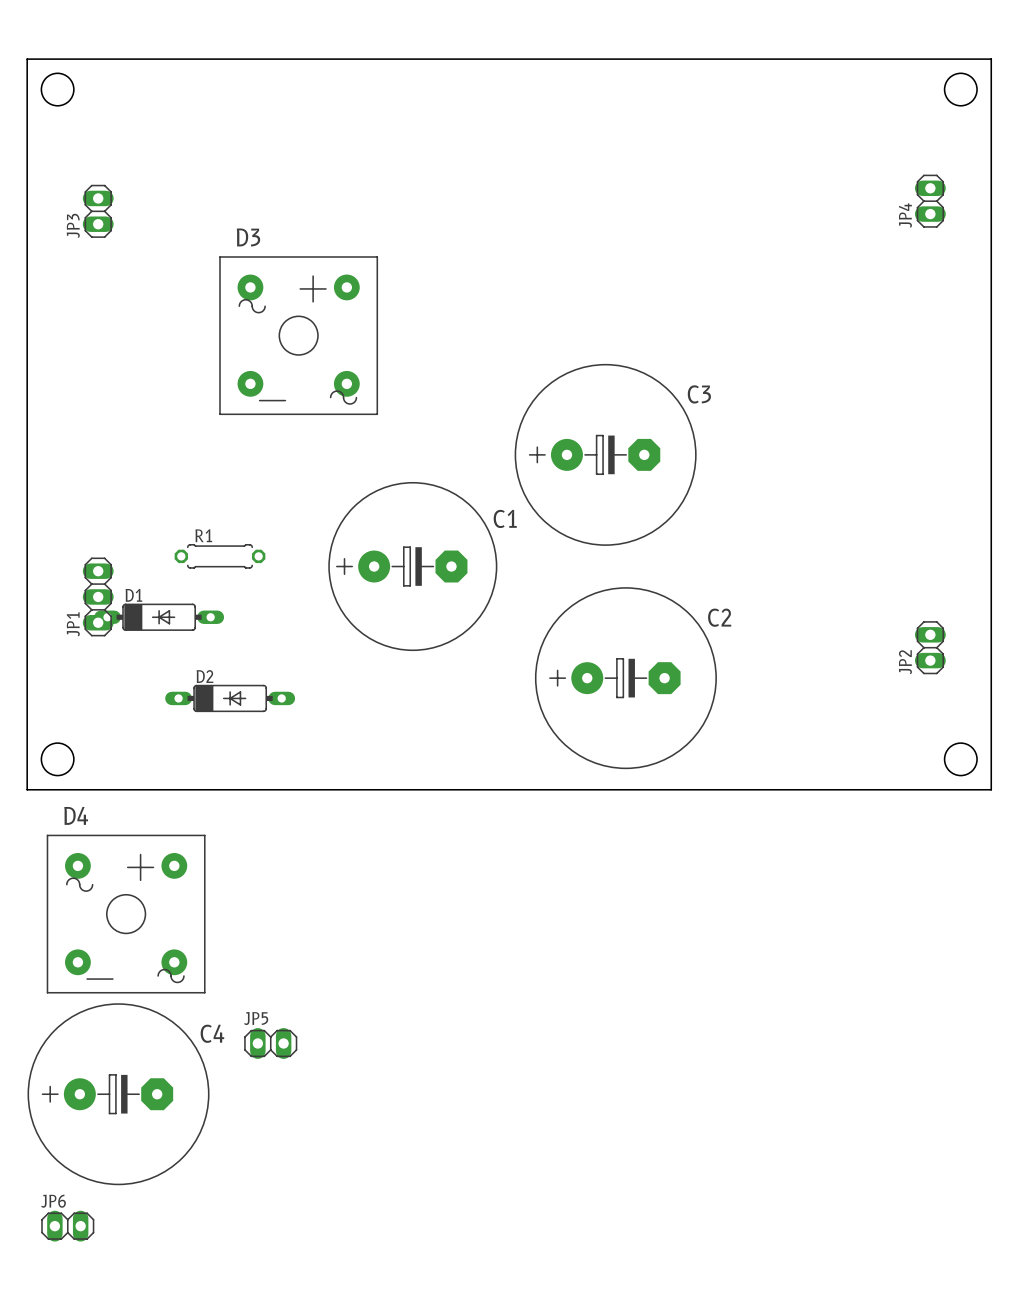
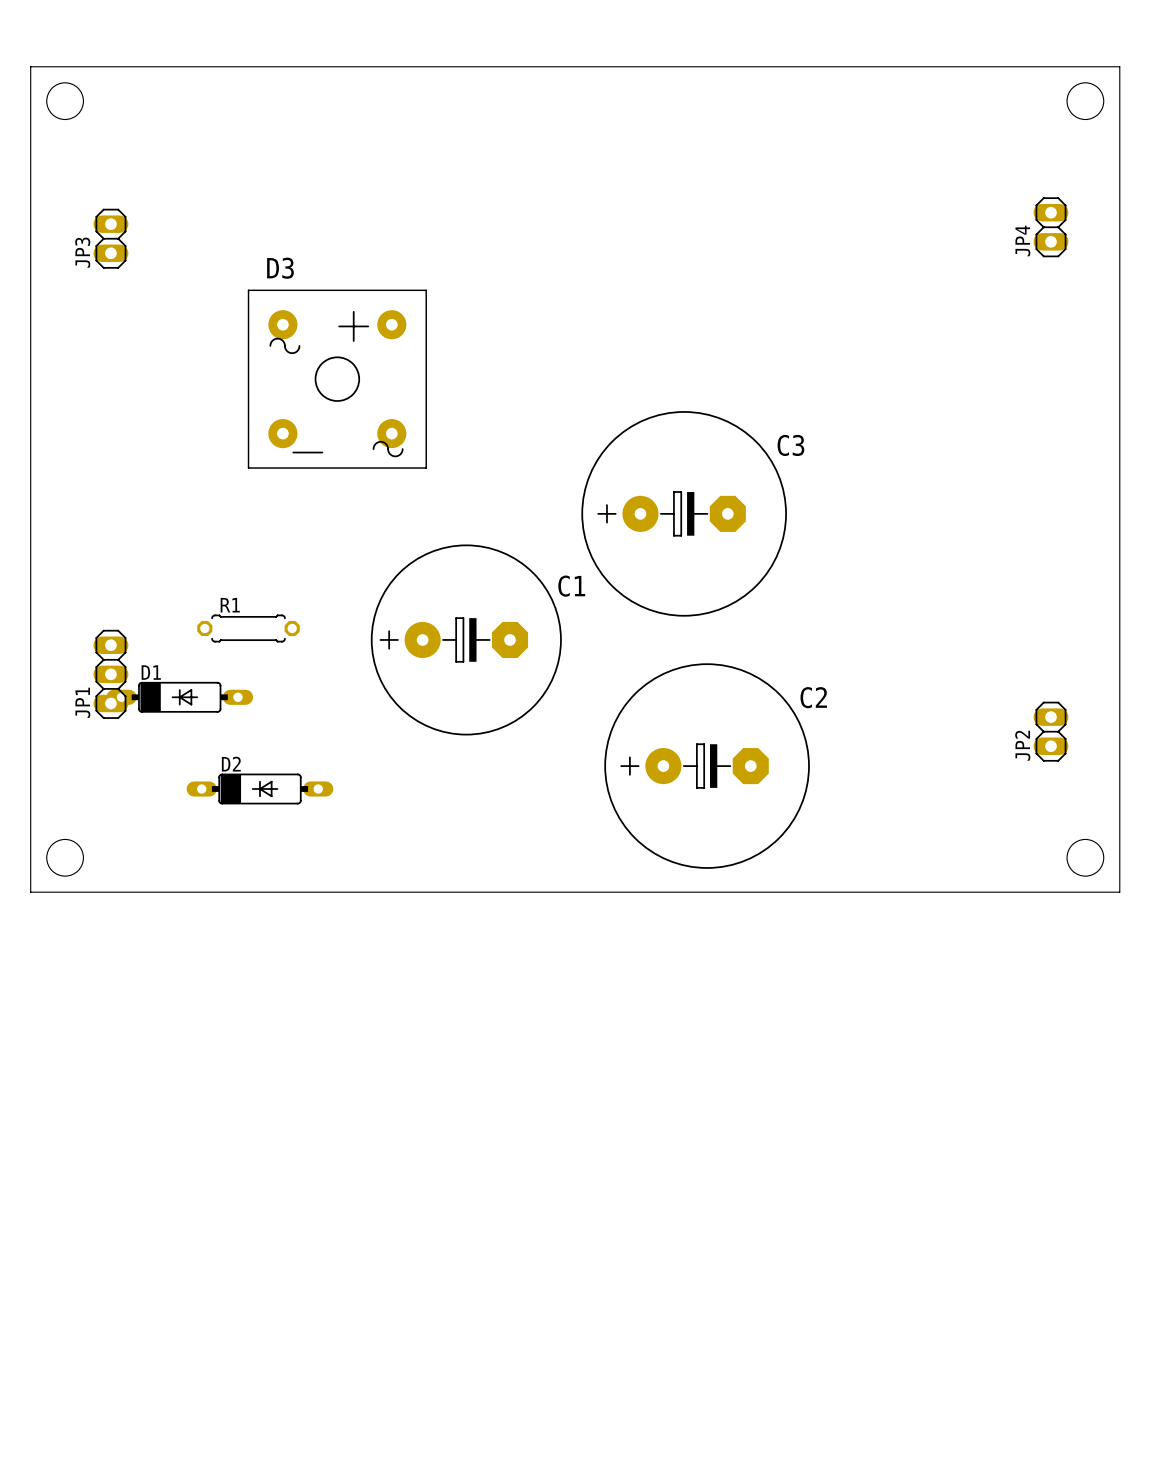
D4: (126, 914) -> none
JP5: (270, 1043) -> none
C4: (118, 1094) -> none
JP6: (67, 1226) -> none

